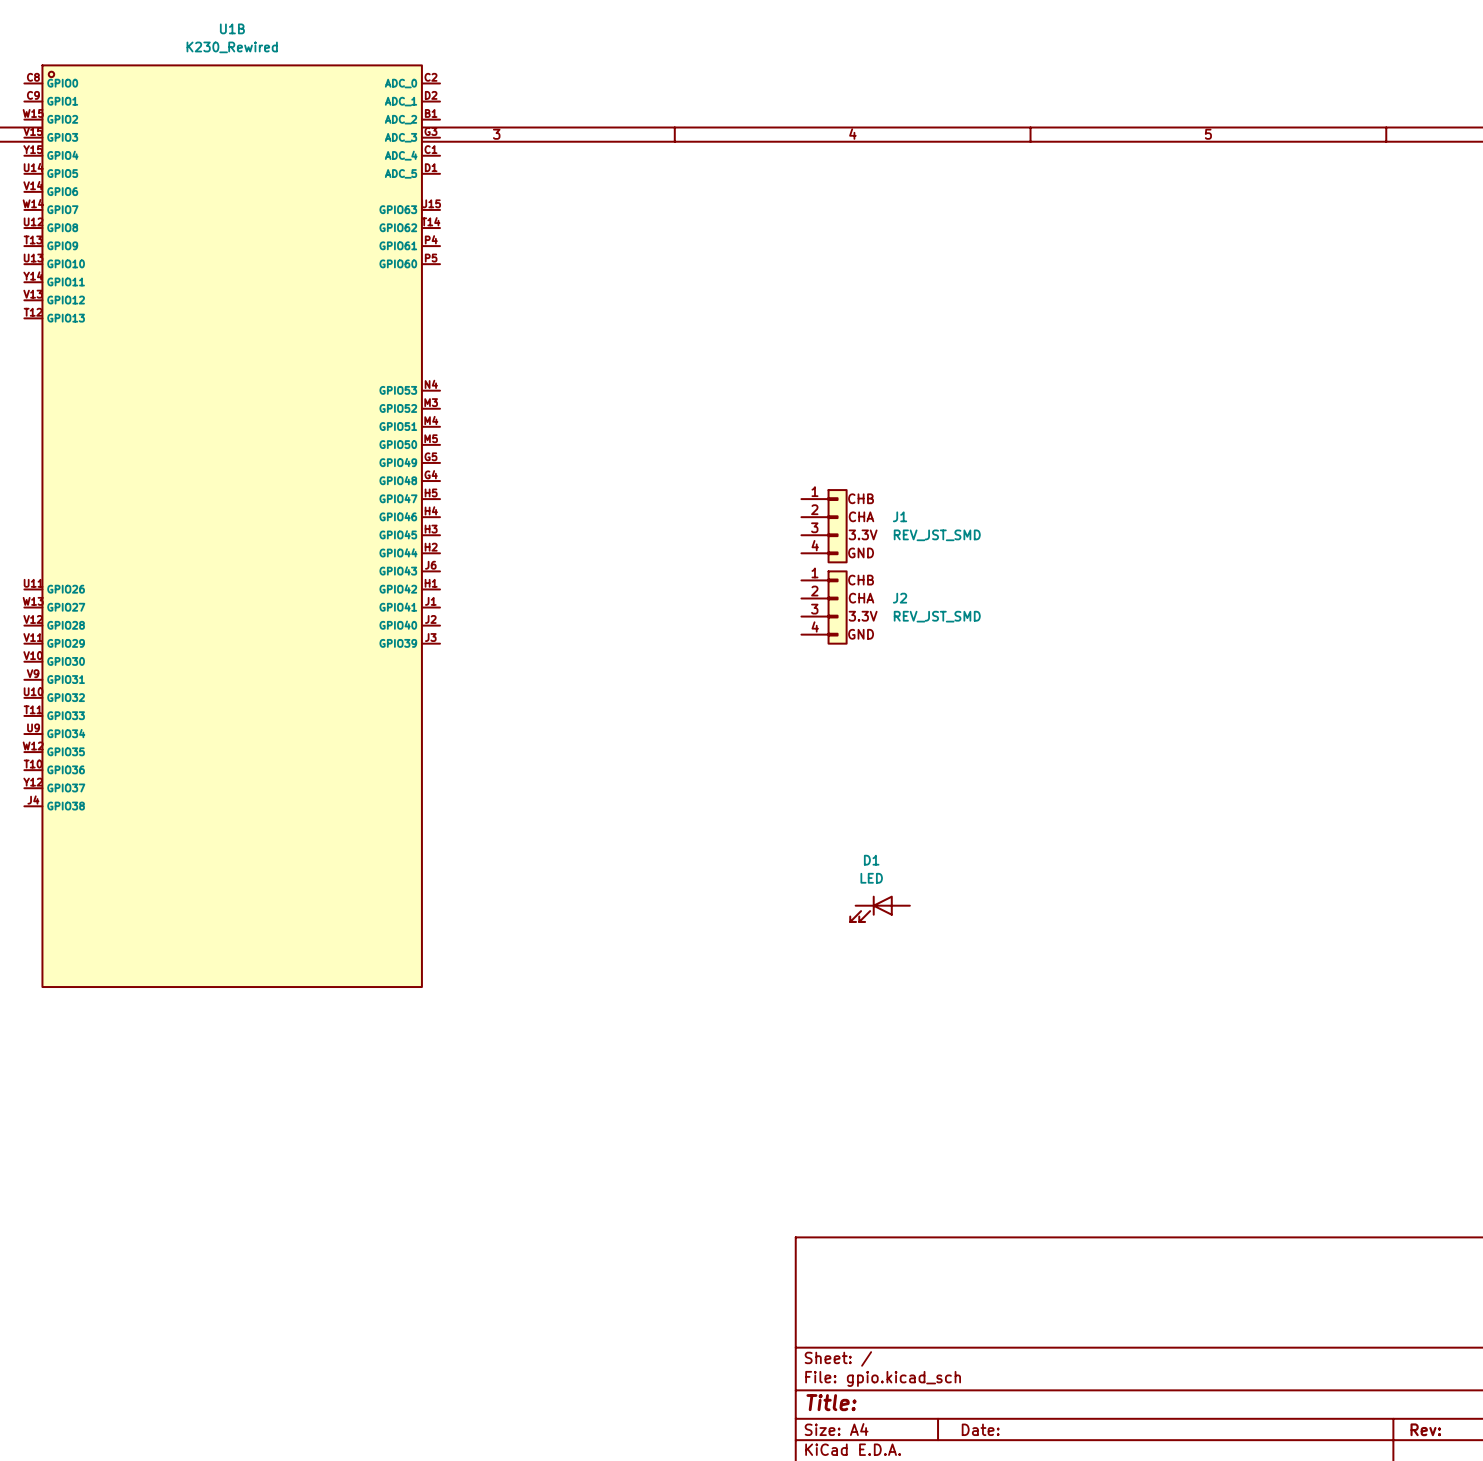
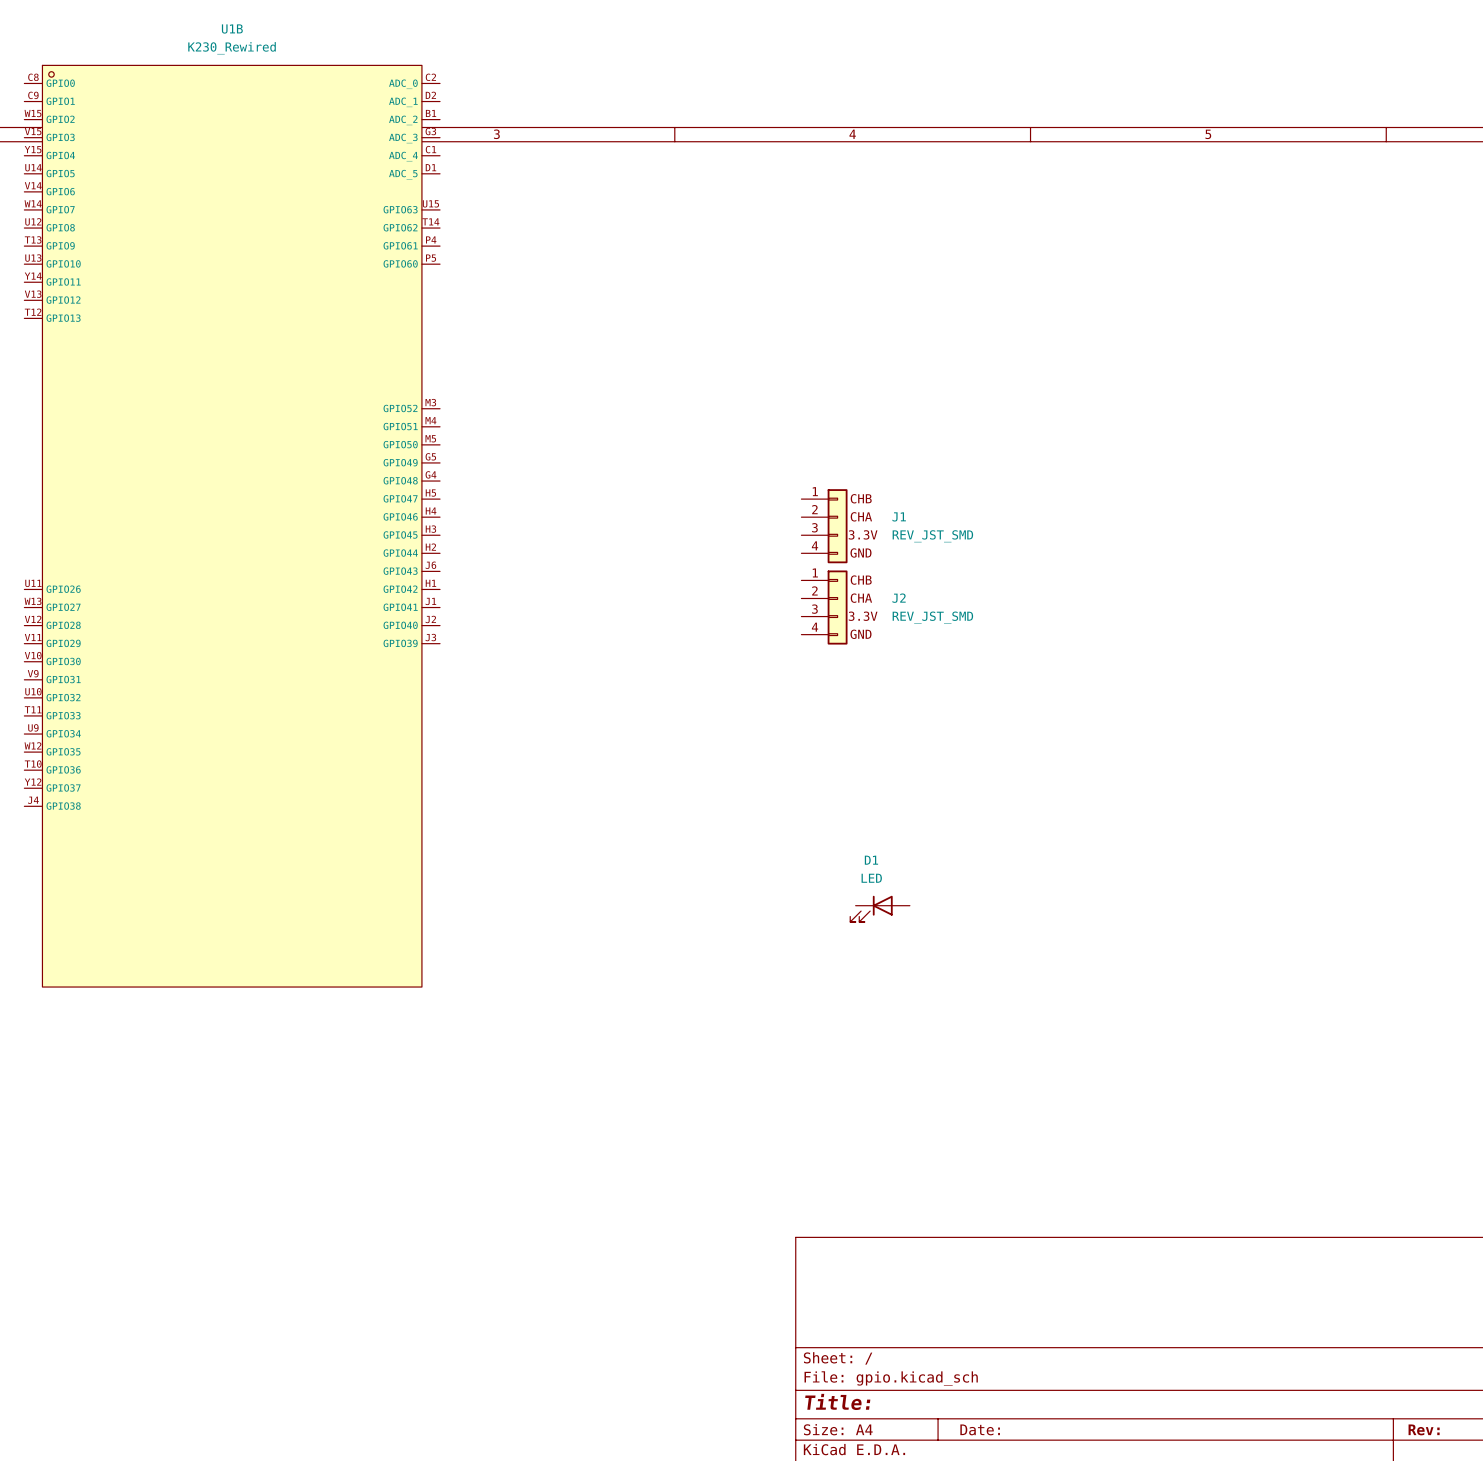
U1B symbol: [24, 65, 441, 988] -> [24, 65, 441, 988]

